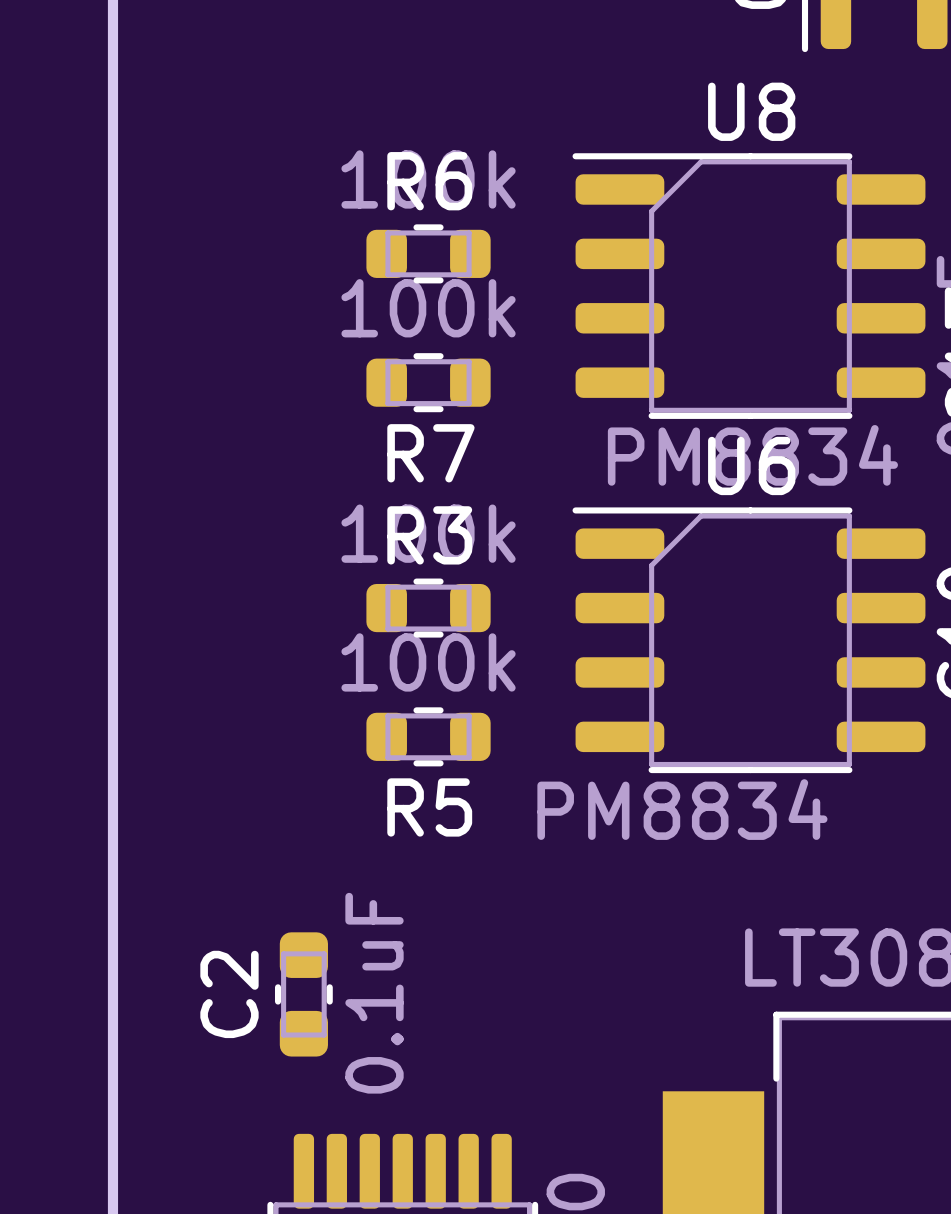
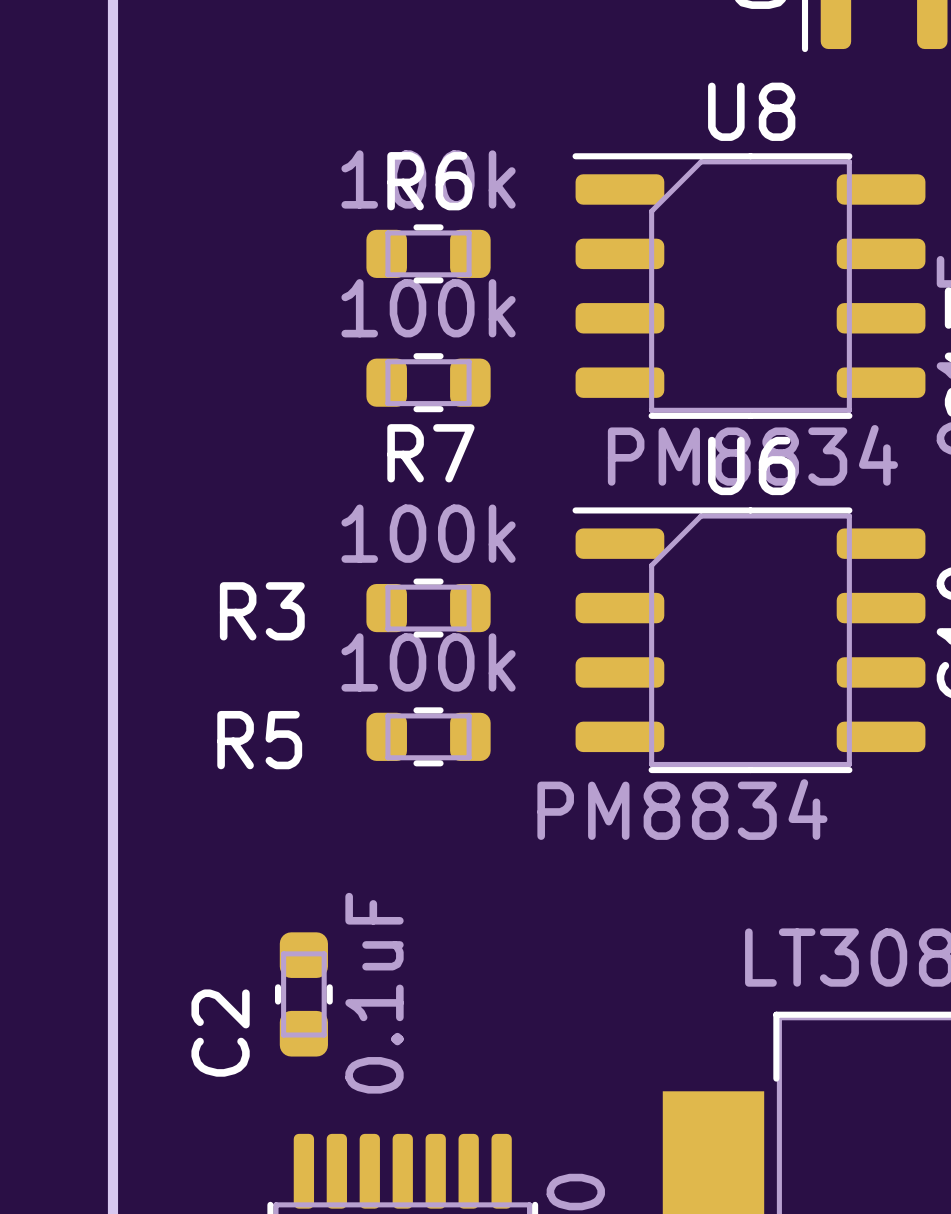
R3 name position: R3 (429, 535) -> R3 (262, 611)
R5 name position: R5 (429, 807) -> R5 (259, 740)
C2 name position: C2 (229, 994) -> C2 (220, 1033)

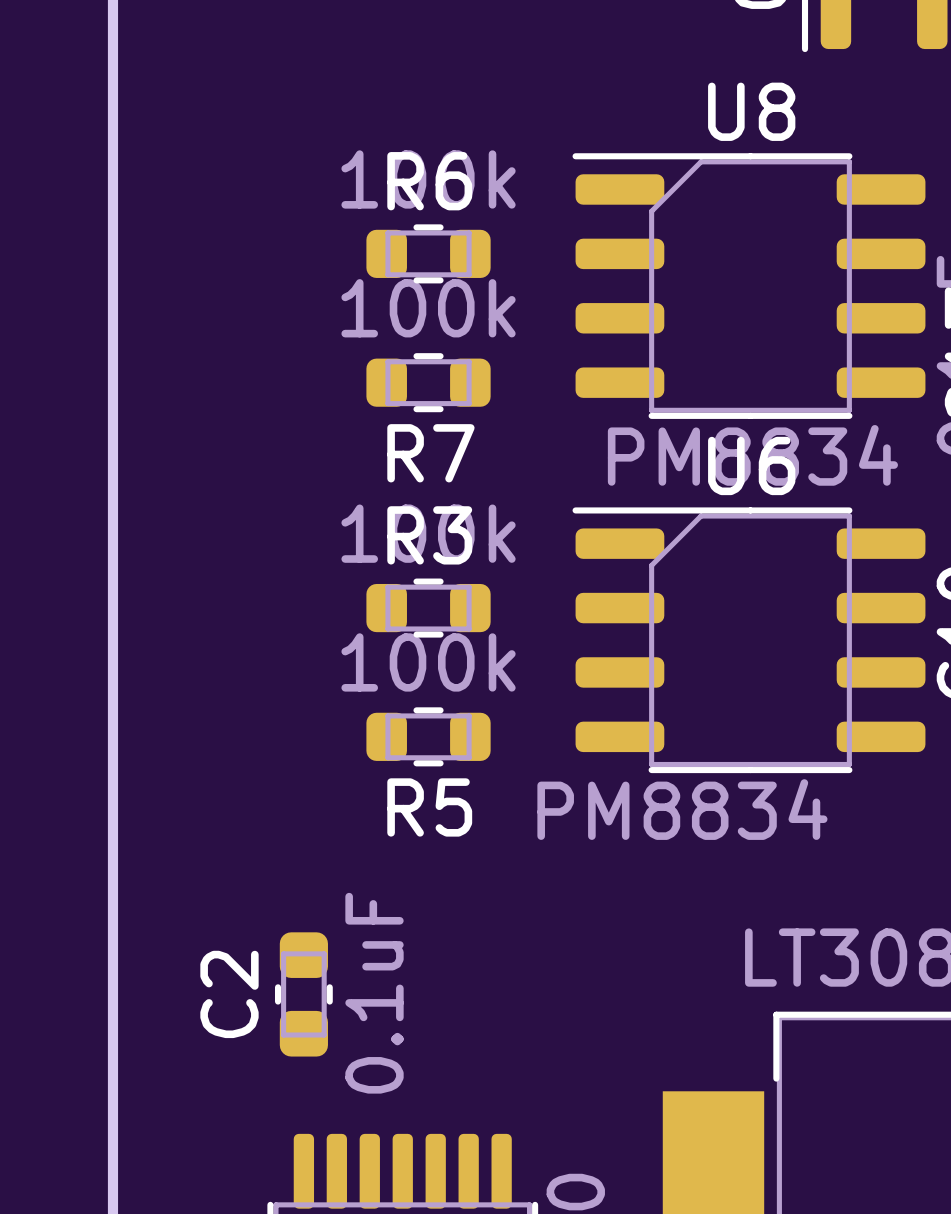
R3 name position: R3 (262, 611) -> R3 (429, 535)
R5 name position: R5 (259, 740) -> R5 (429, 807)
C2 name position: C2 (220, 1033) -> C2 (229, 994)

